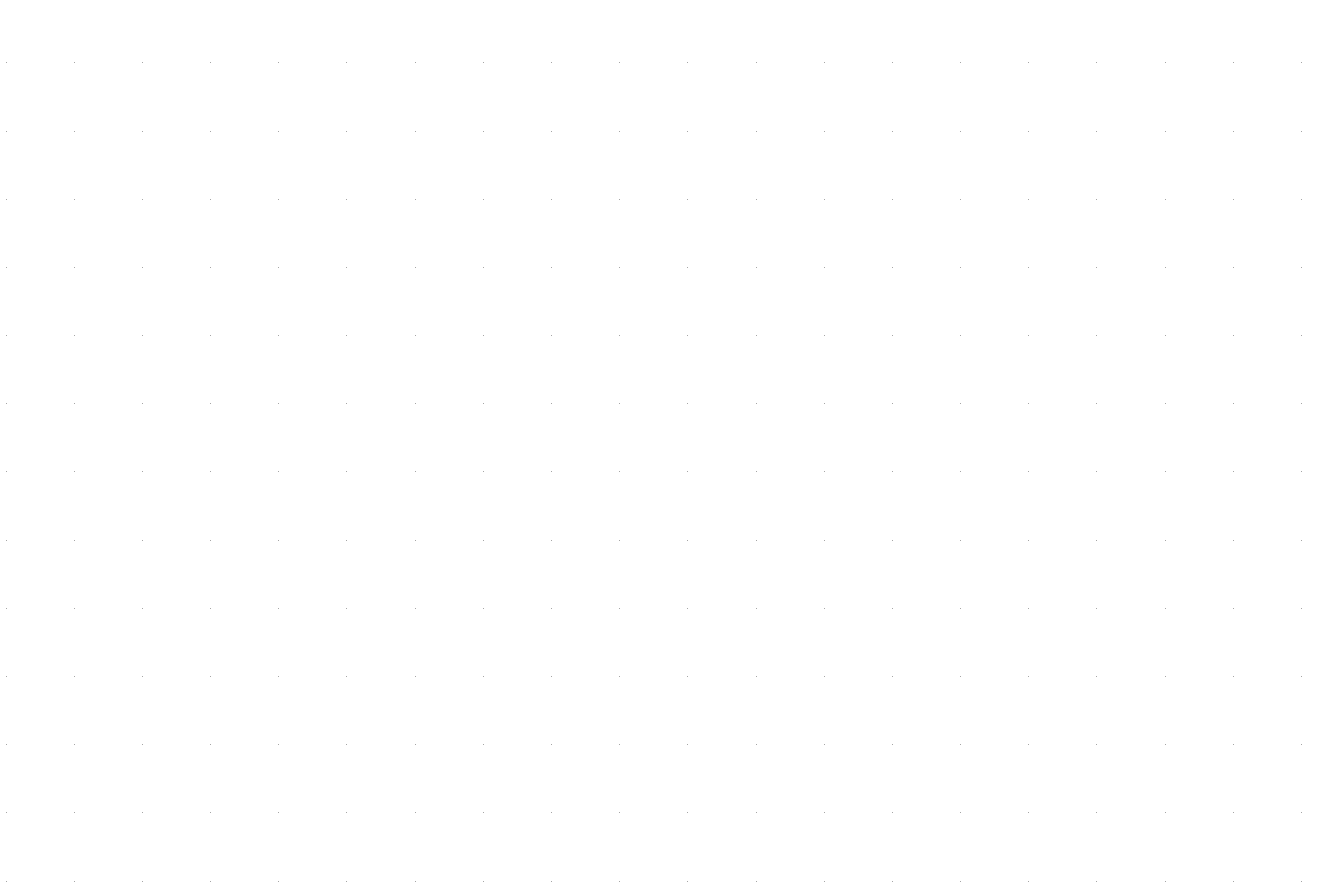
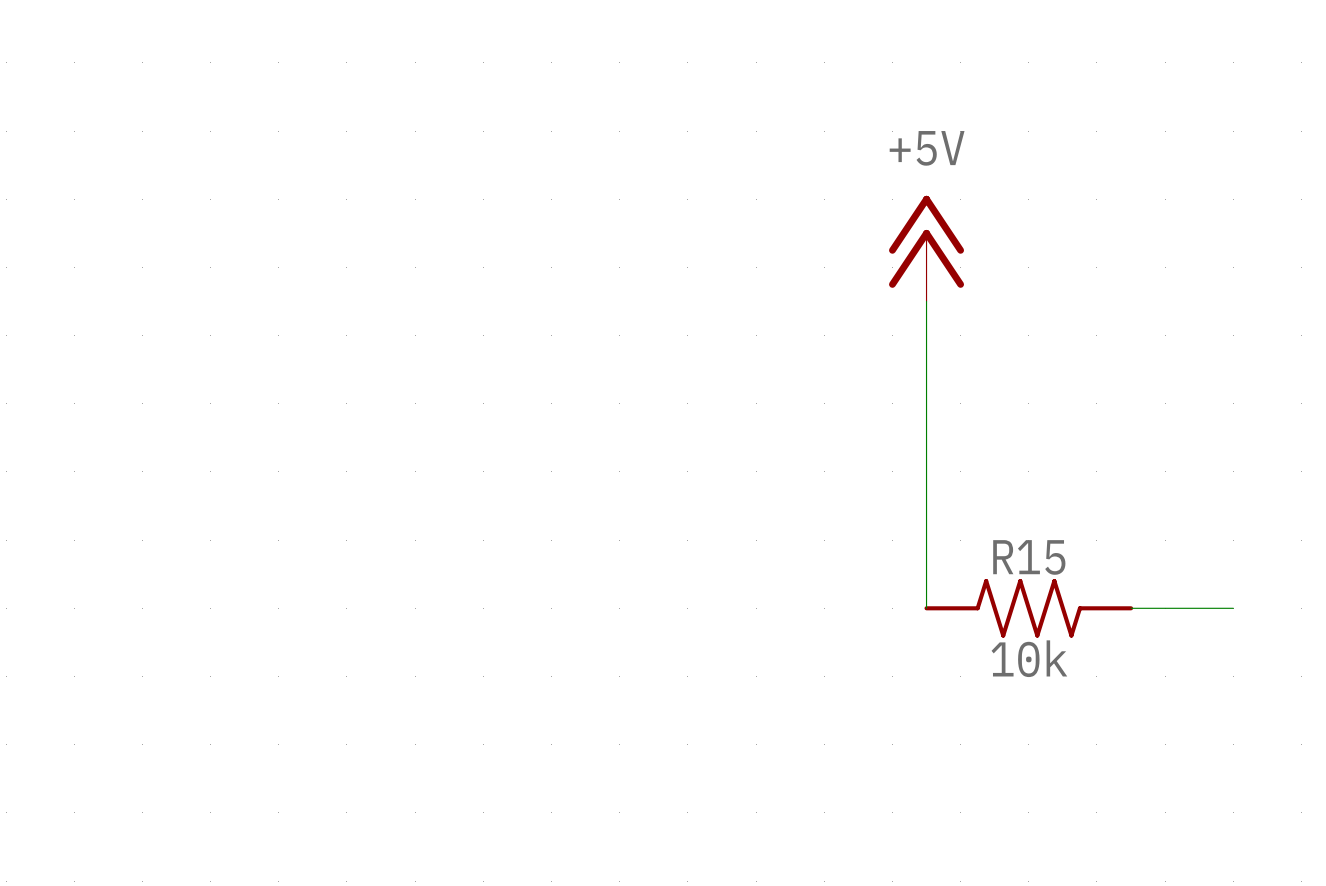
power symbol: none -> +5V (926, 248)
wire: none -> (926, 301) (926, 608)
R15: none -> (1028, 608)
wire: none -> (1131, 608) (1233, 608)

